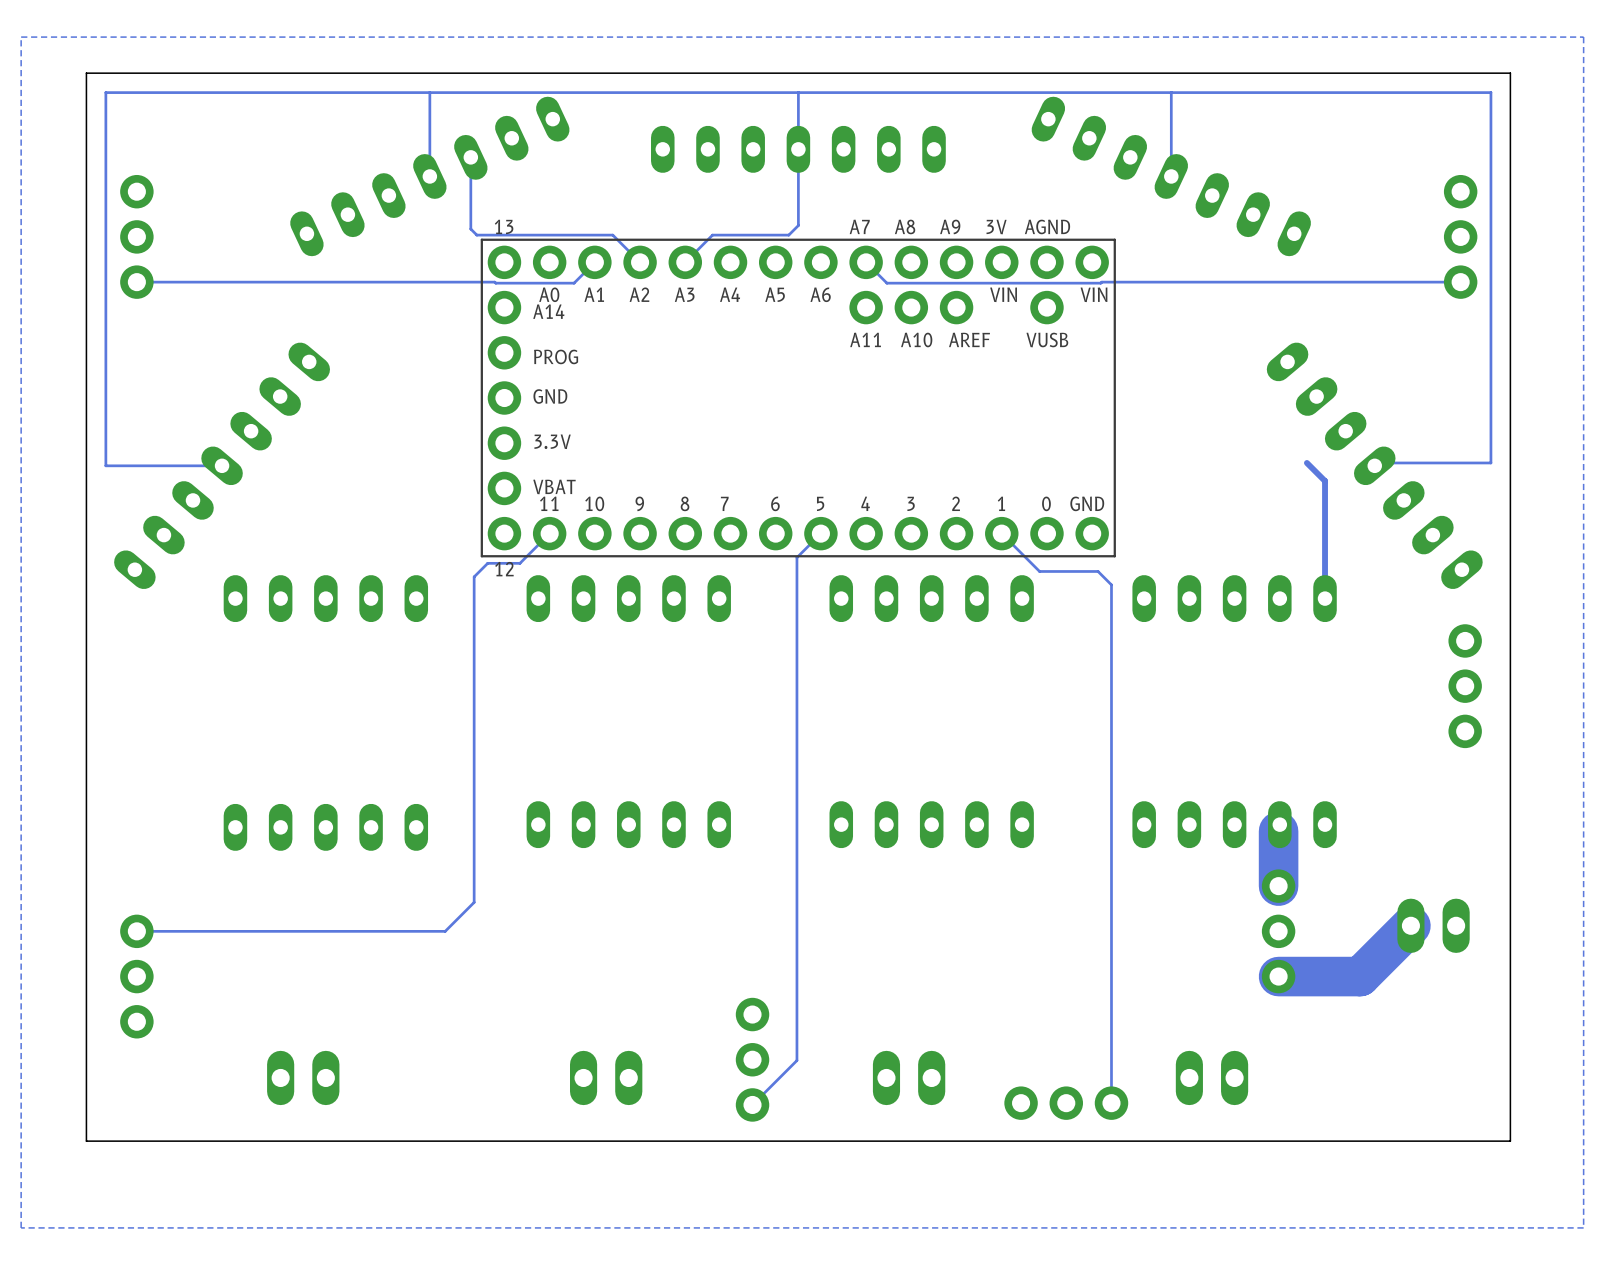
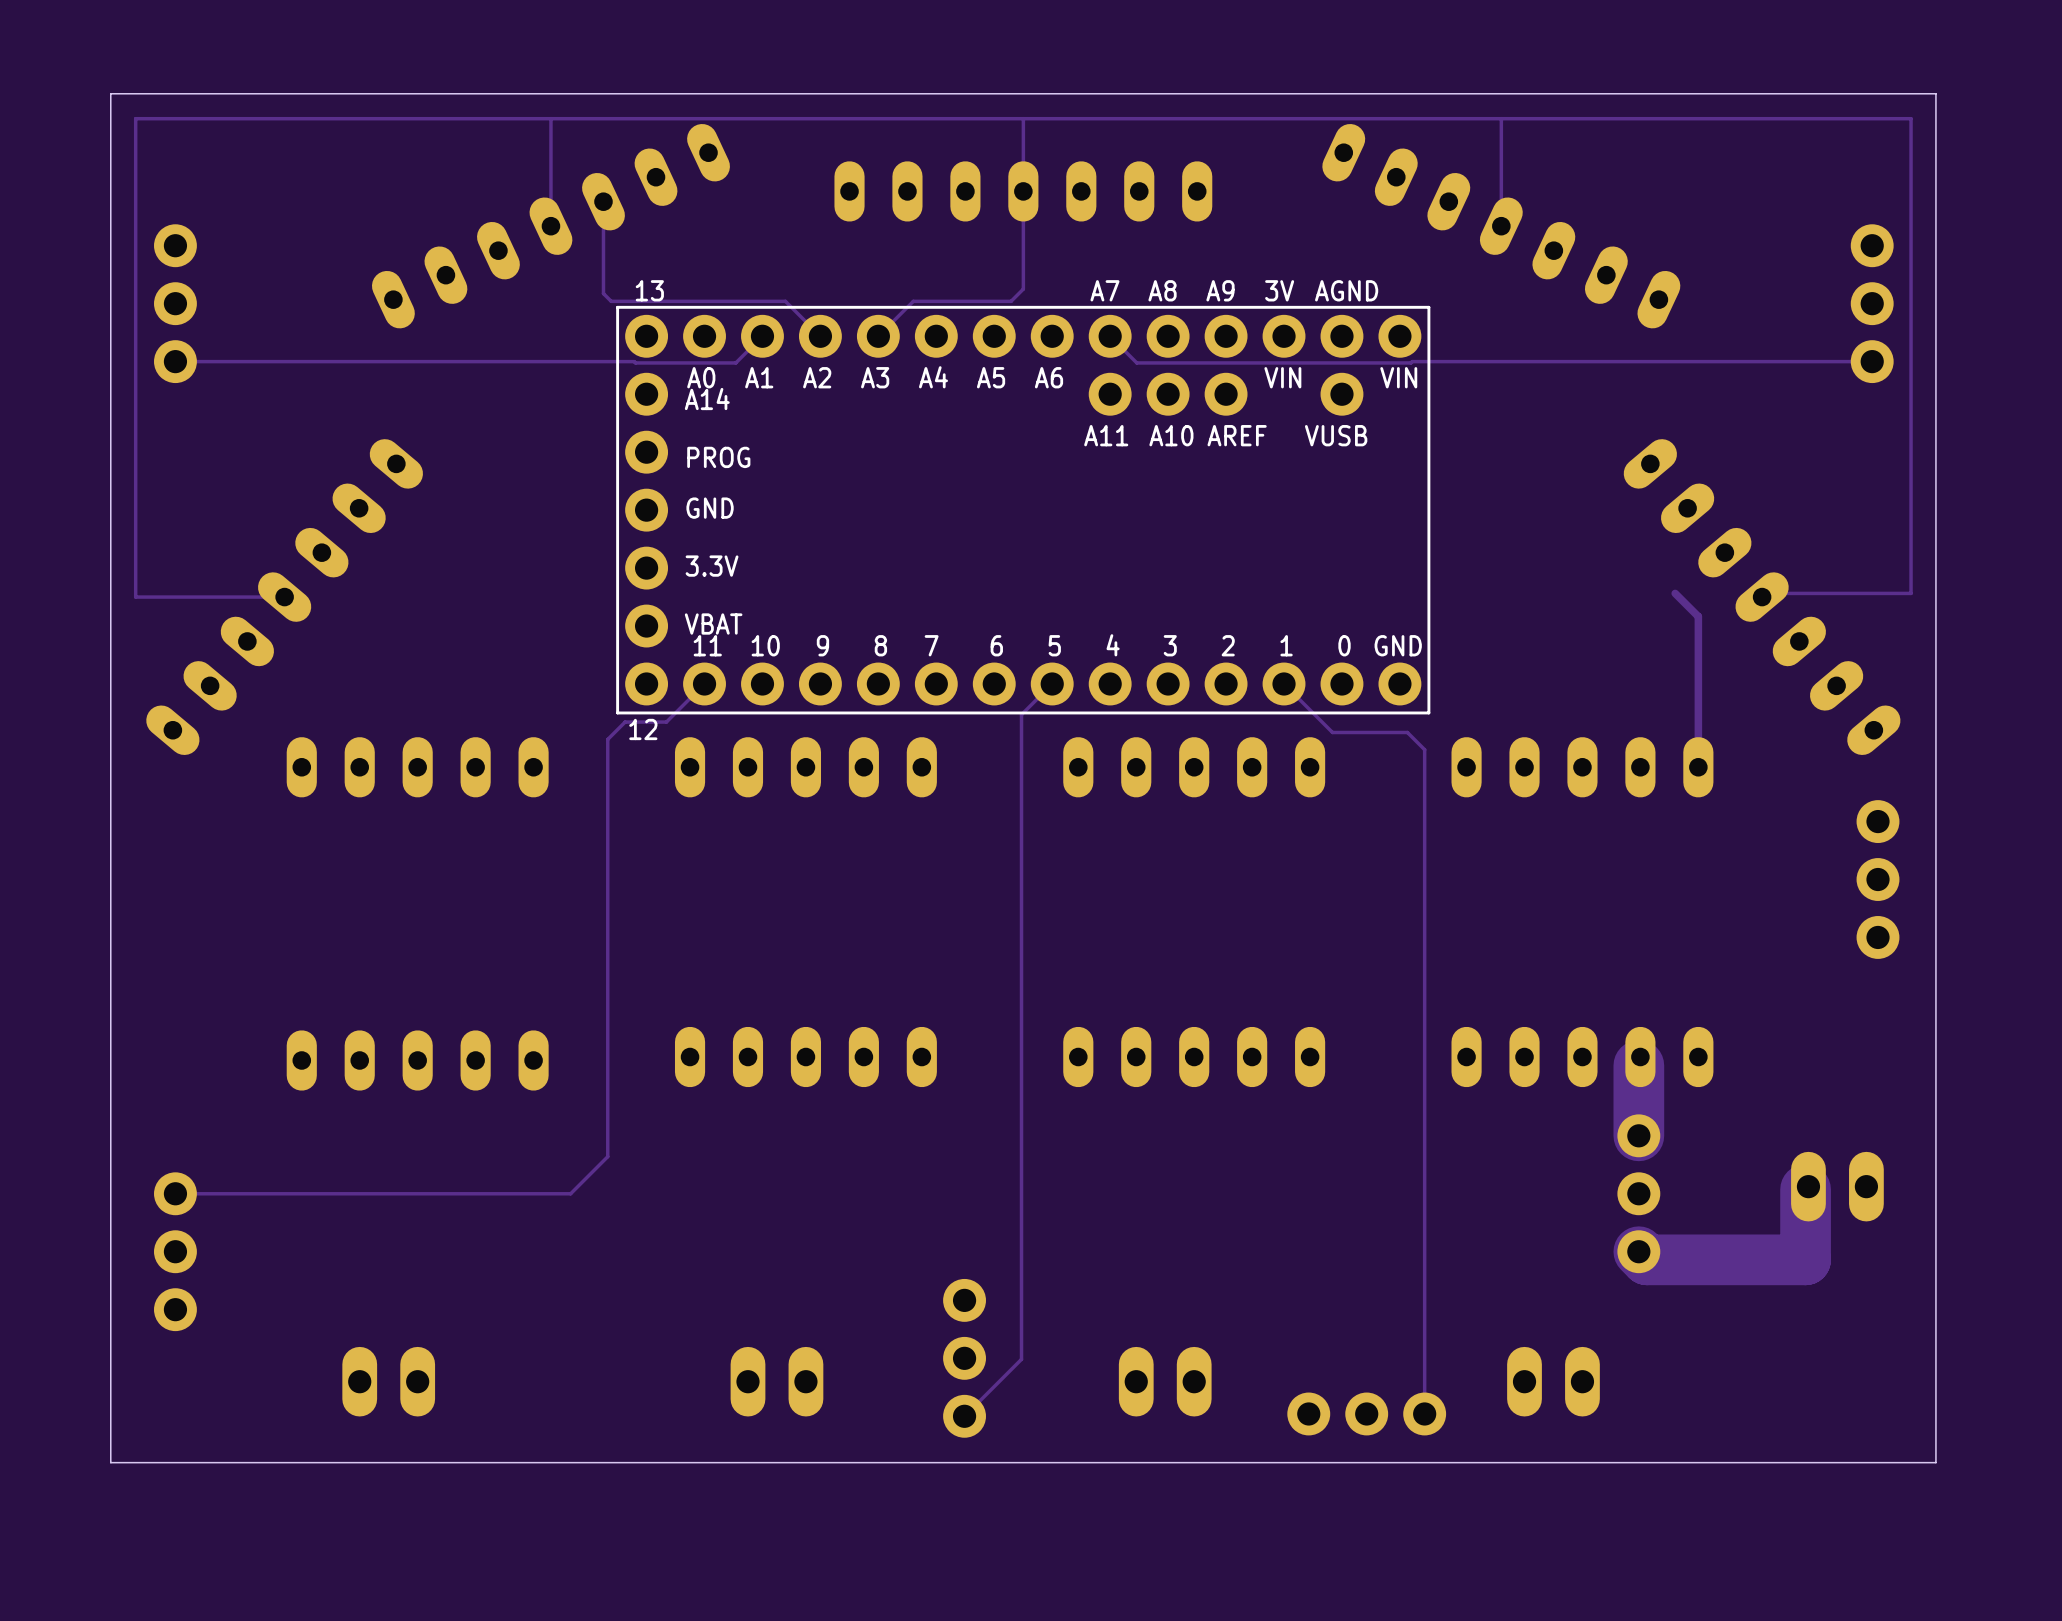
zone outline: (1583, 37) (1583, 1227) (21, 1227) (21, 37) (1583, 37) -> none
track: (1410, 925) (1360, 976) (1278, 976) -> (1805, 1189) (1805, 1259) (1646, 1259) (1638, 1251)

